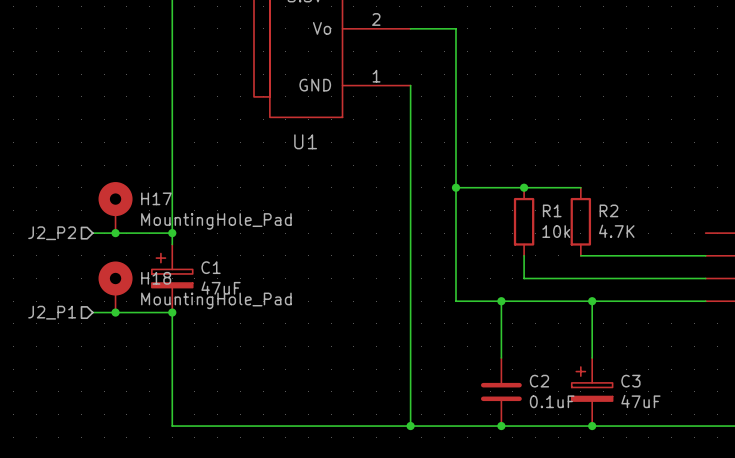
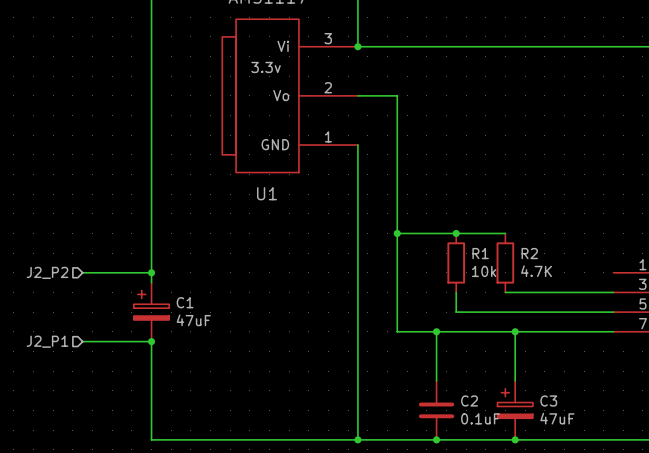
H17: MountingHole_Pad (115, 207) -> none
junction: (115, 233) -> none
H18: MountingHole_Pad (115, 287) -> none
junction: (115, 312) -> none

